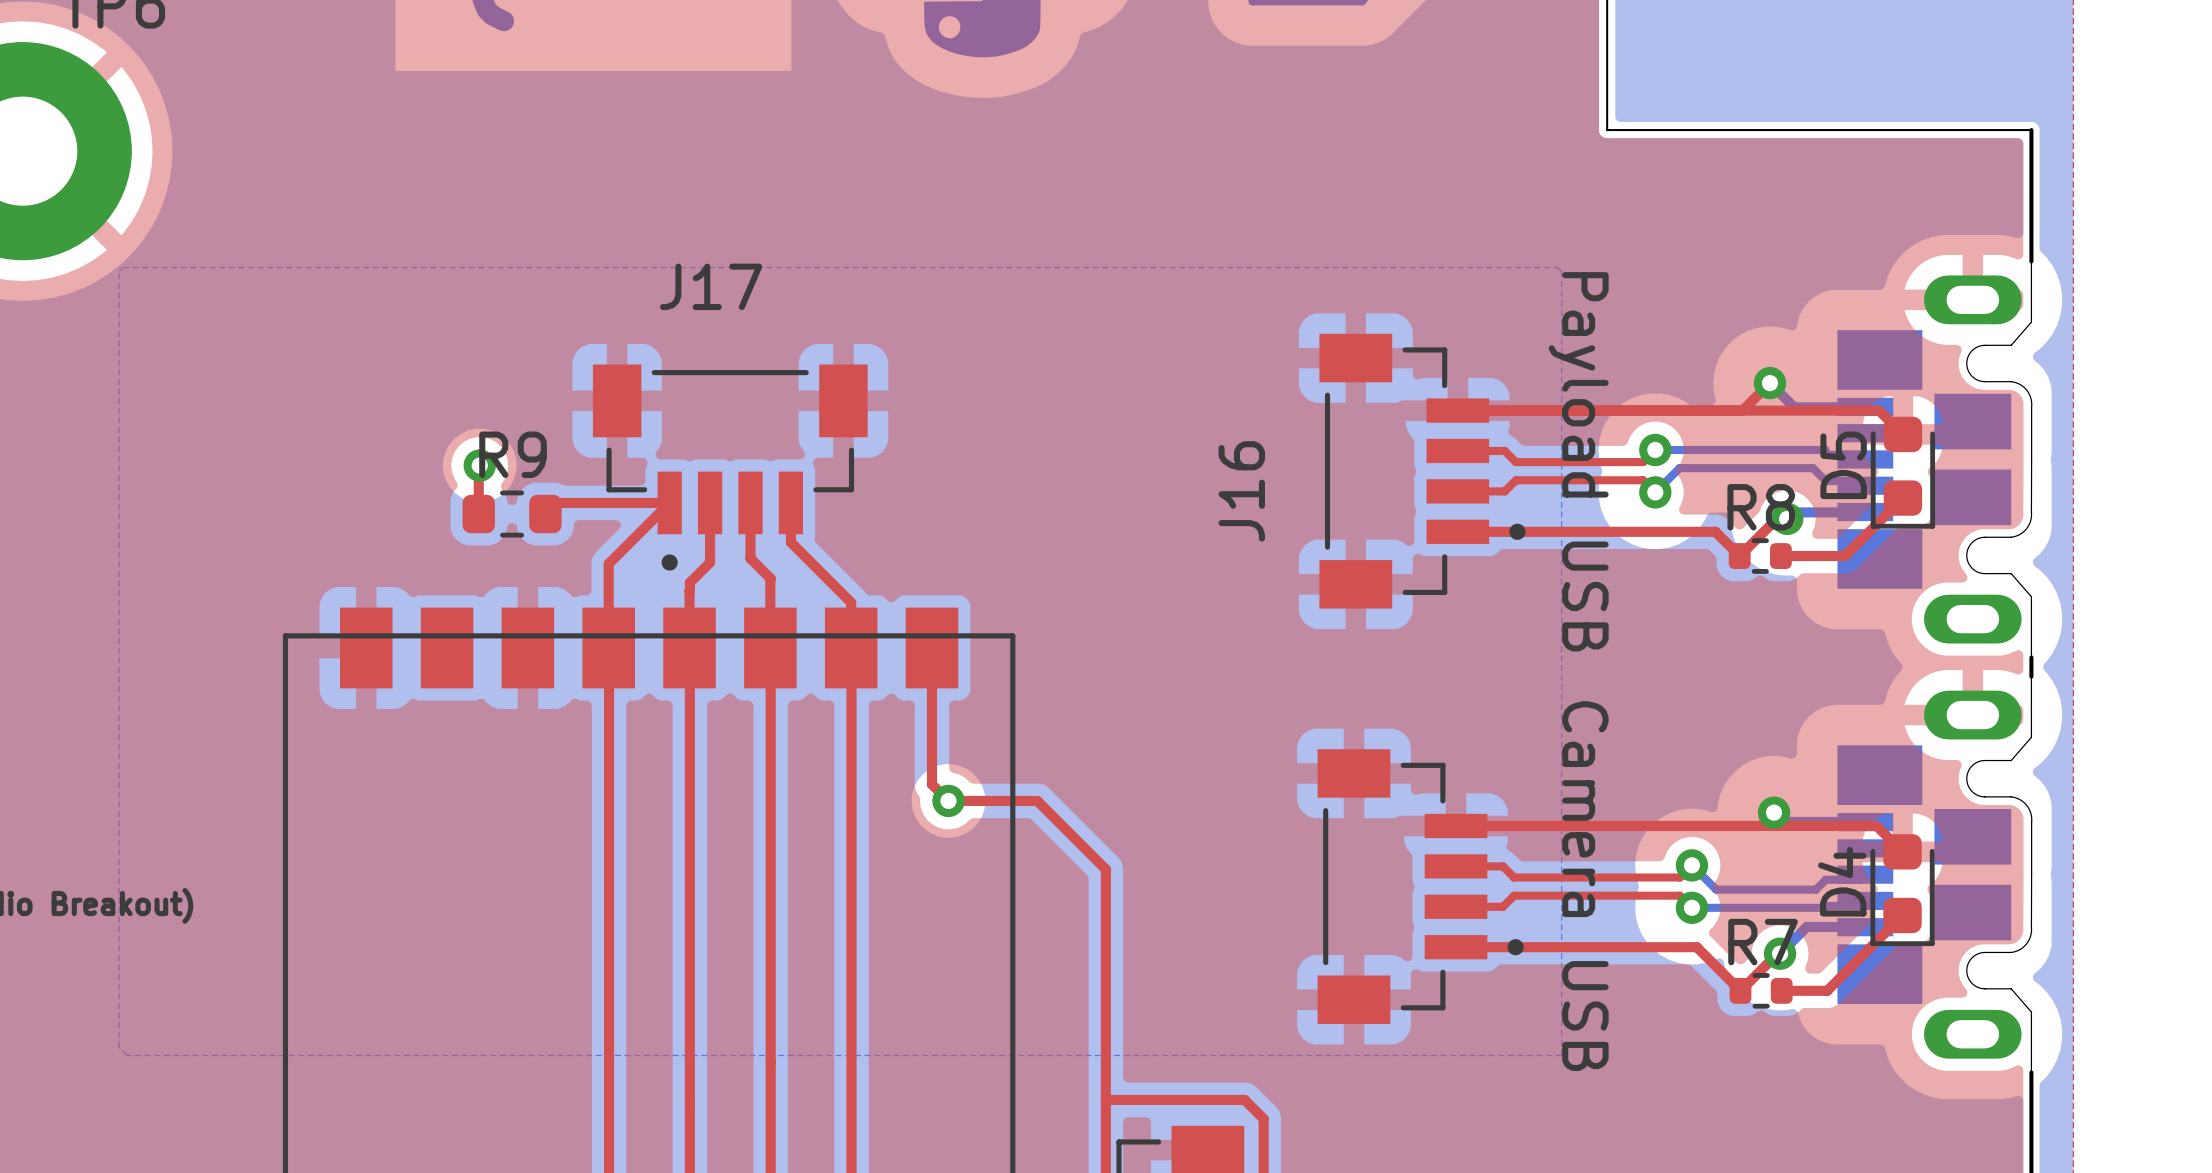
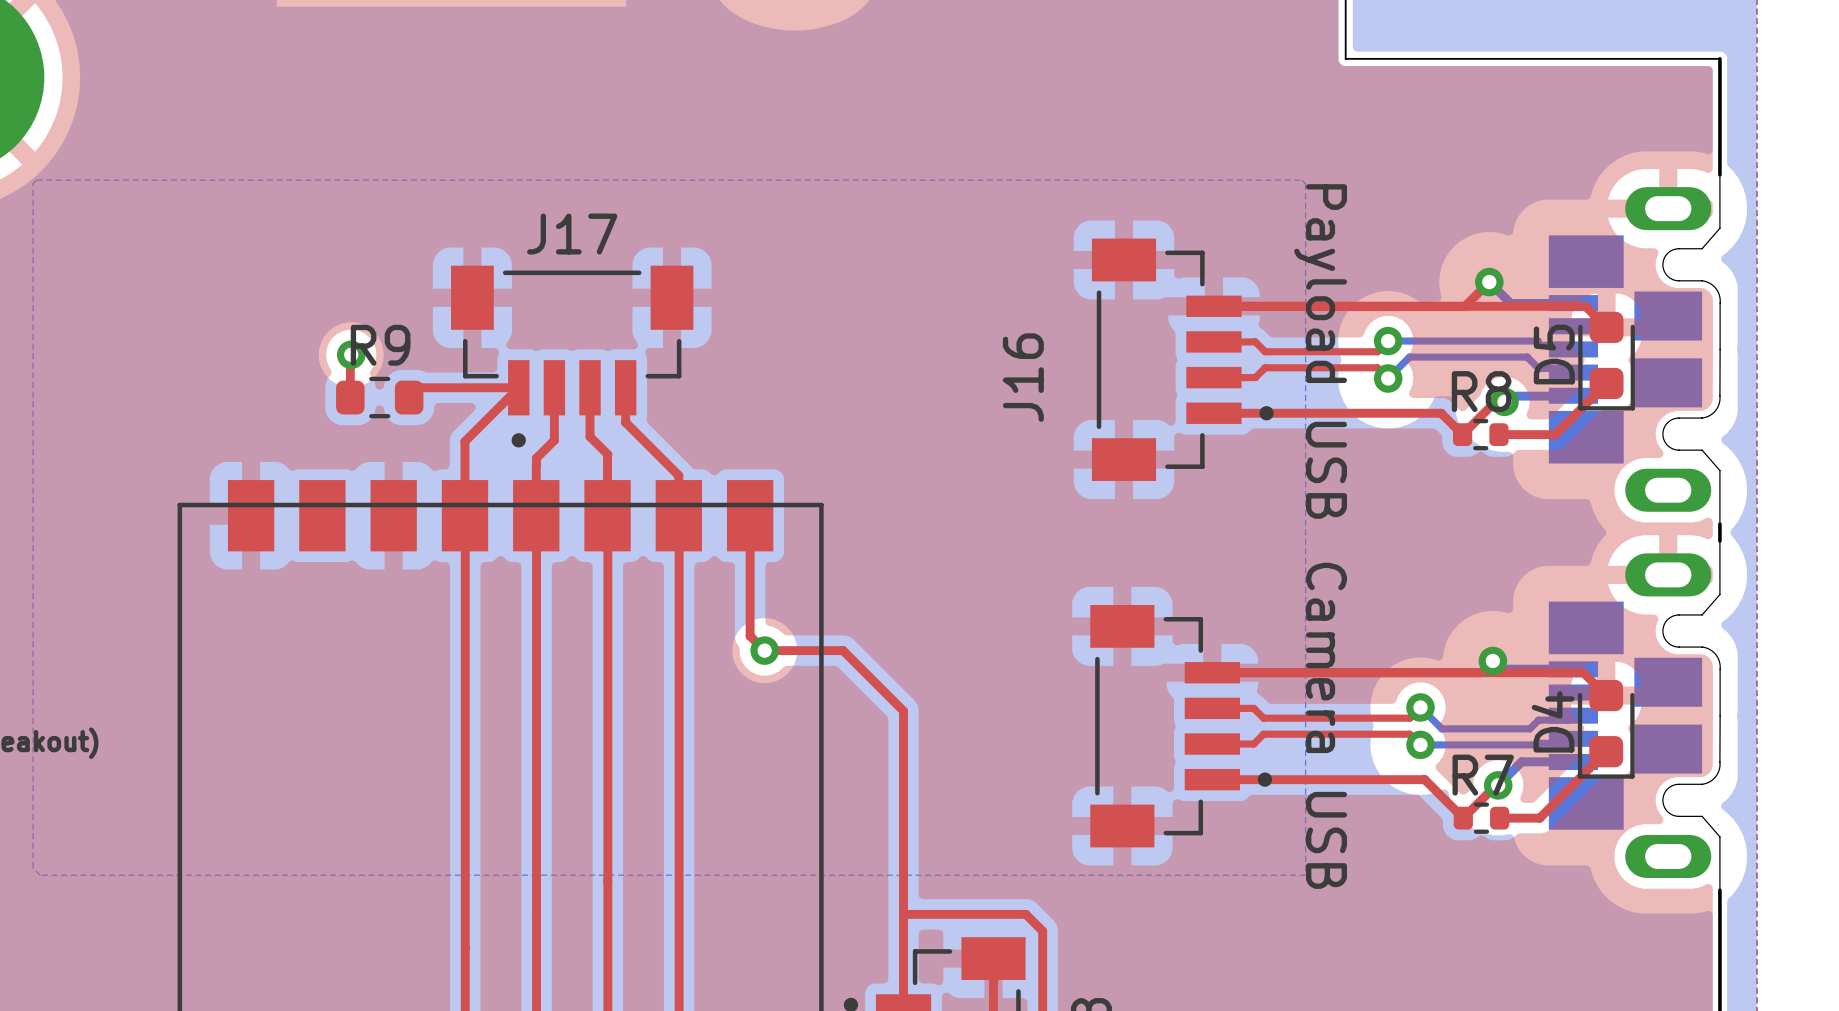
J17 name position: J17 (711, 286) -> J17 (572, 234)

